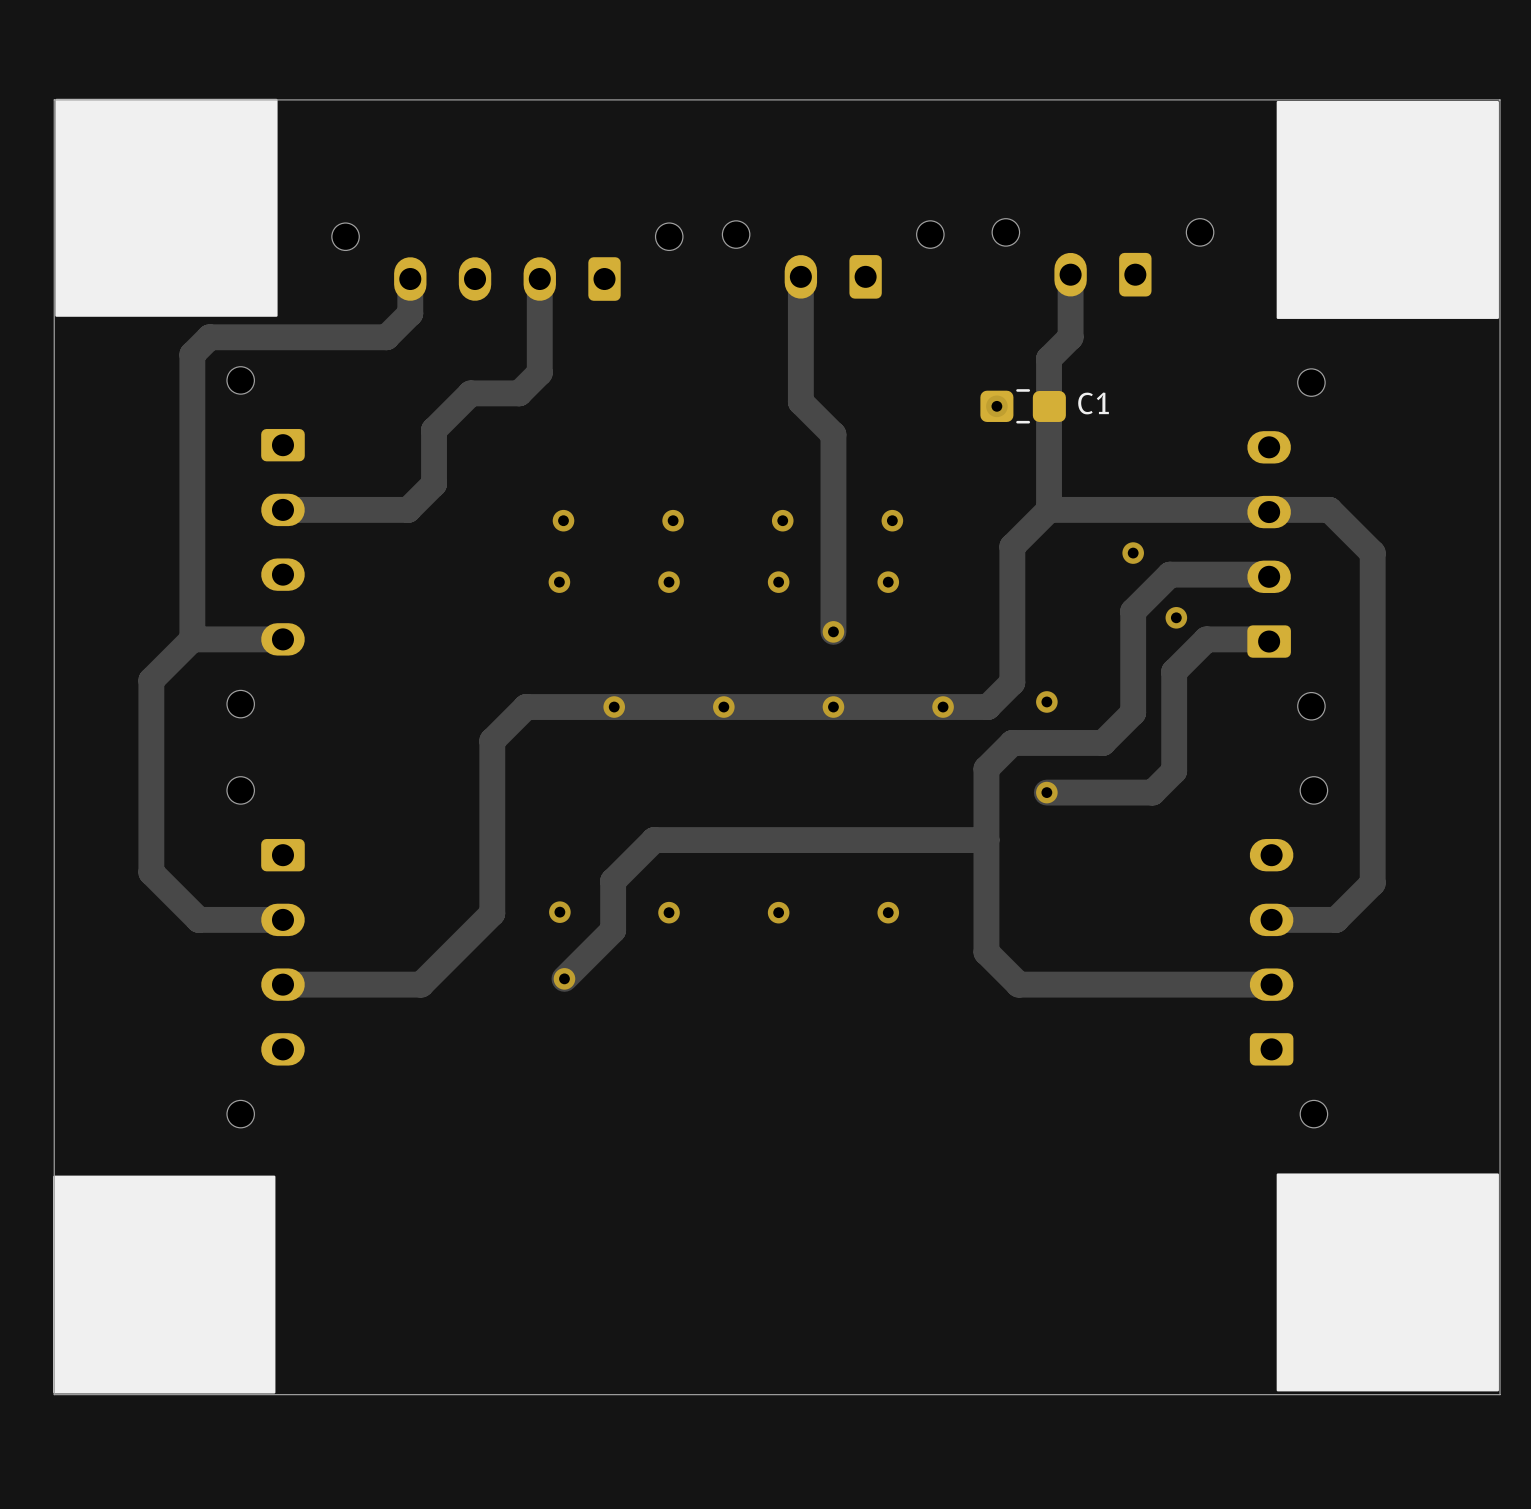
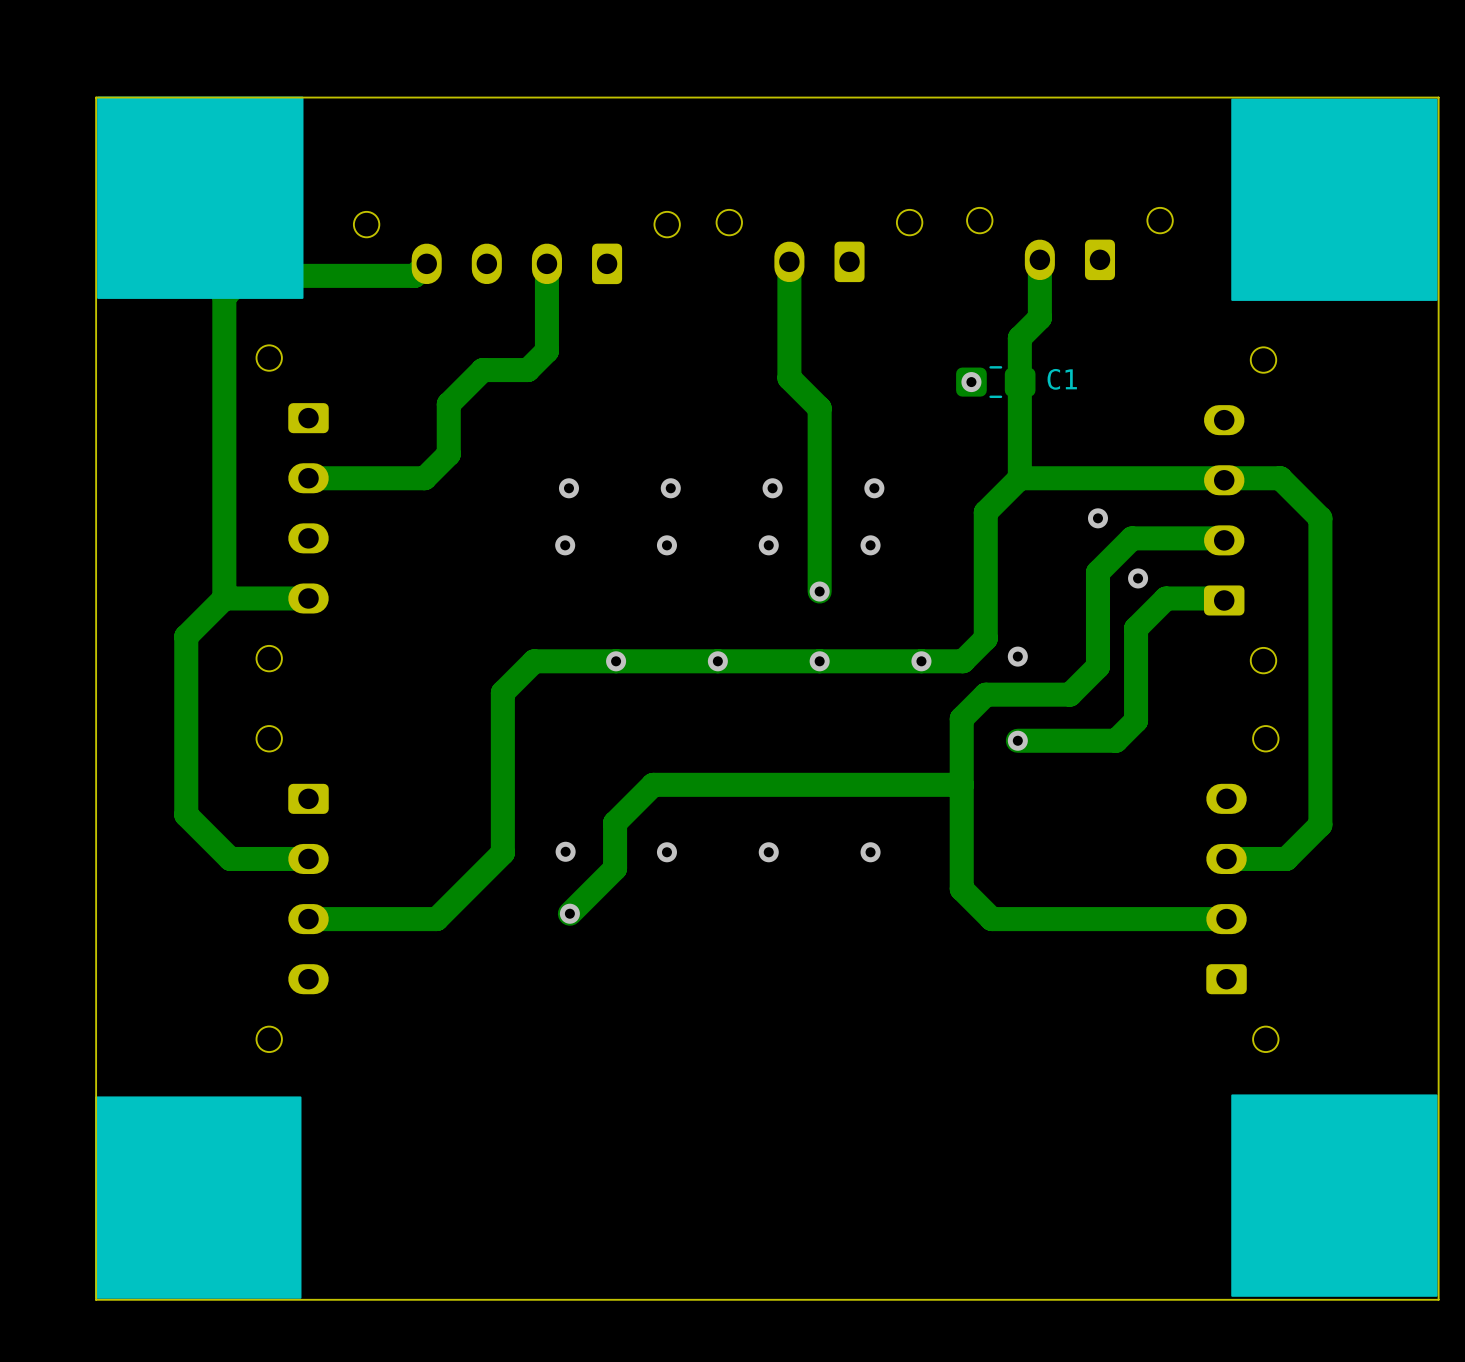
track: (410, 279) (410, 313) (386, 337) (209, 337) (192, 354) -> (426, 263) (414, 275) (245, 275) (224, 296) (224, 333)

